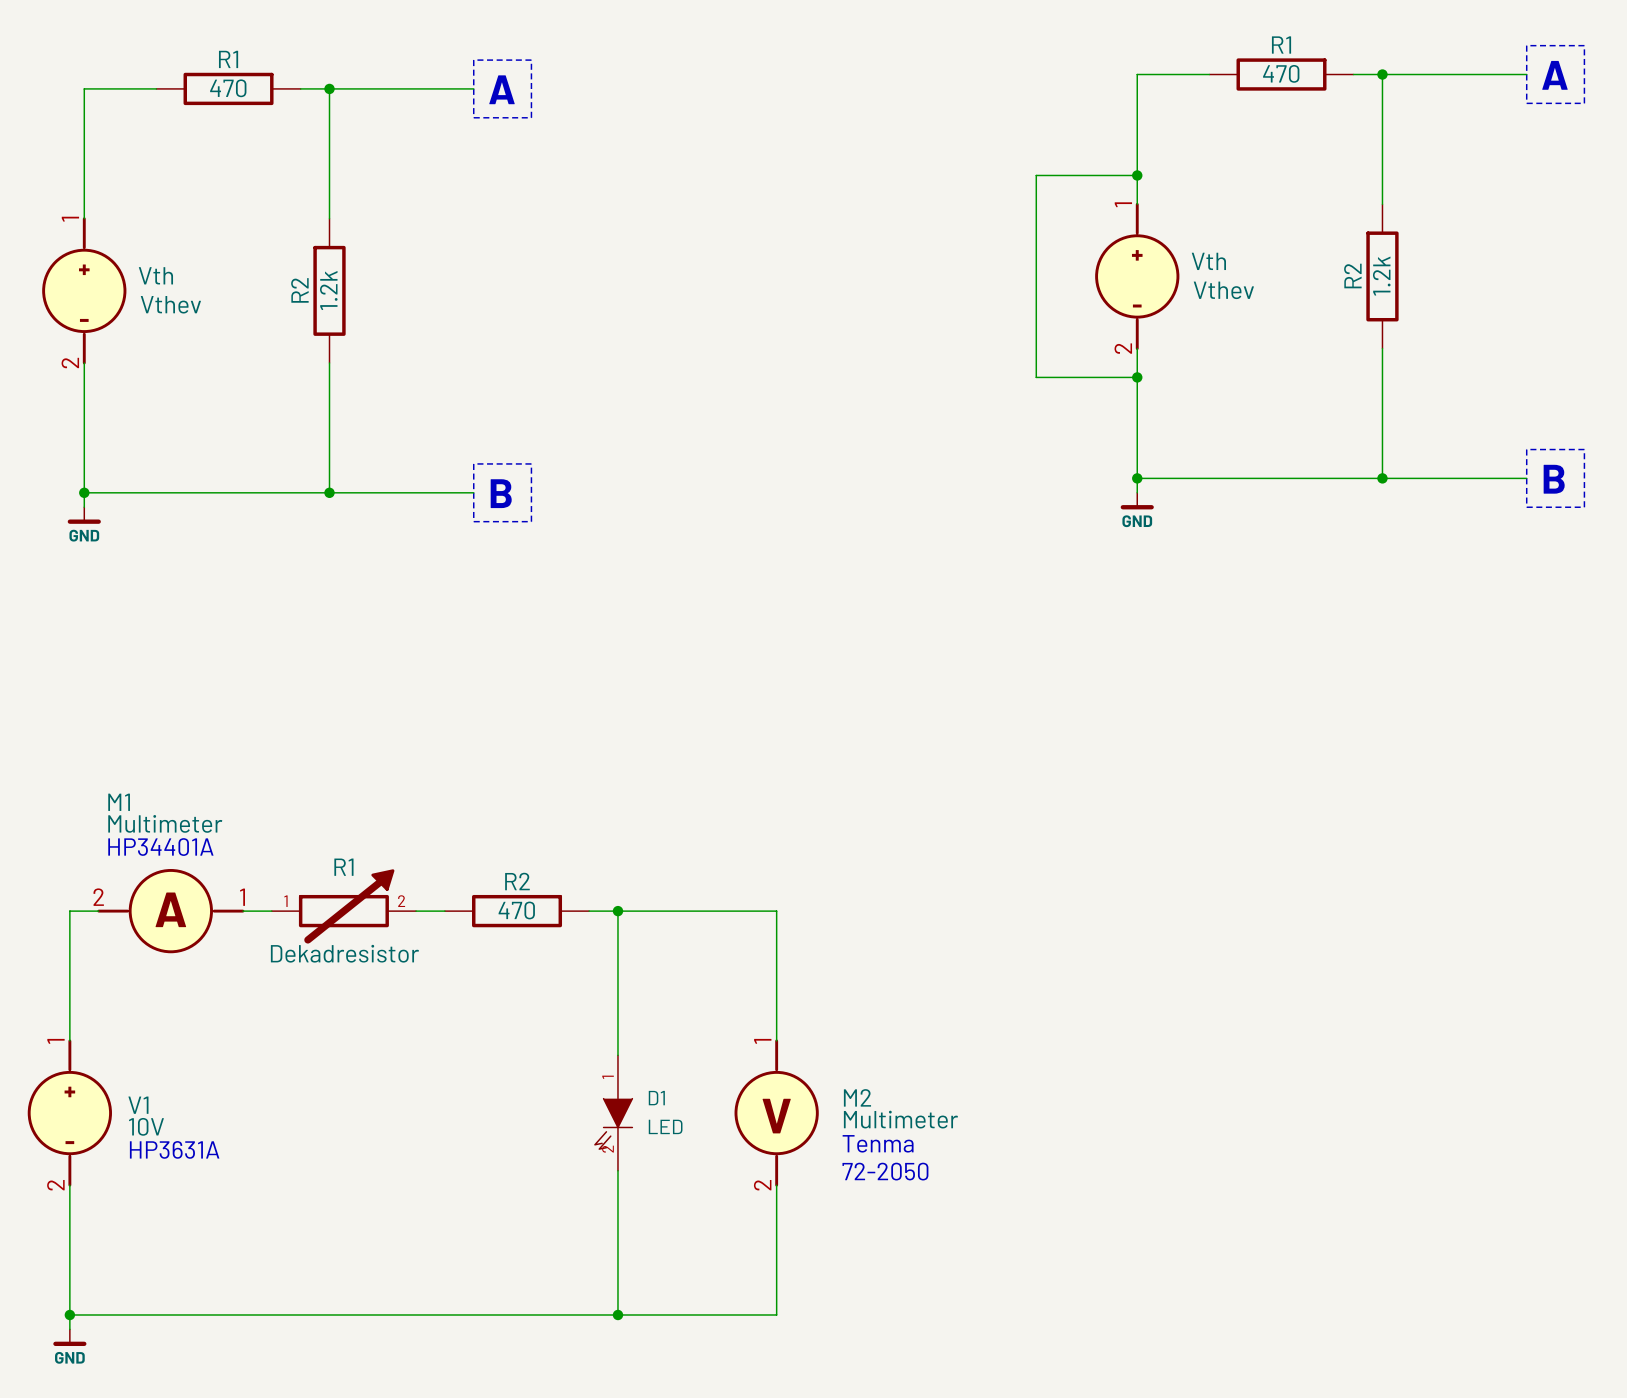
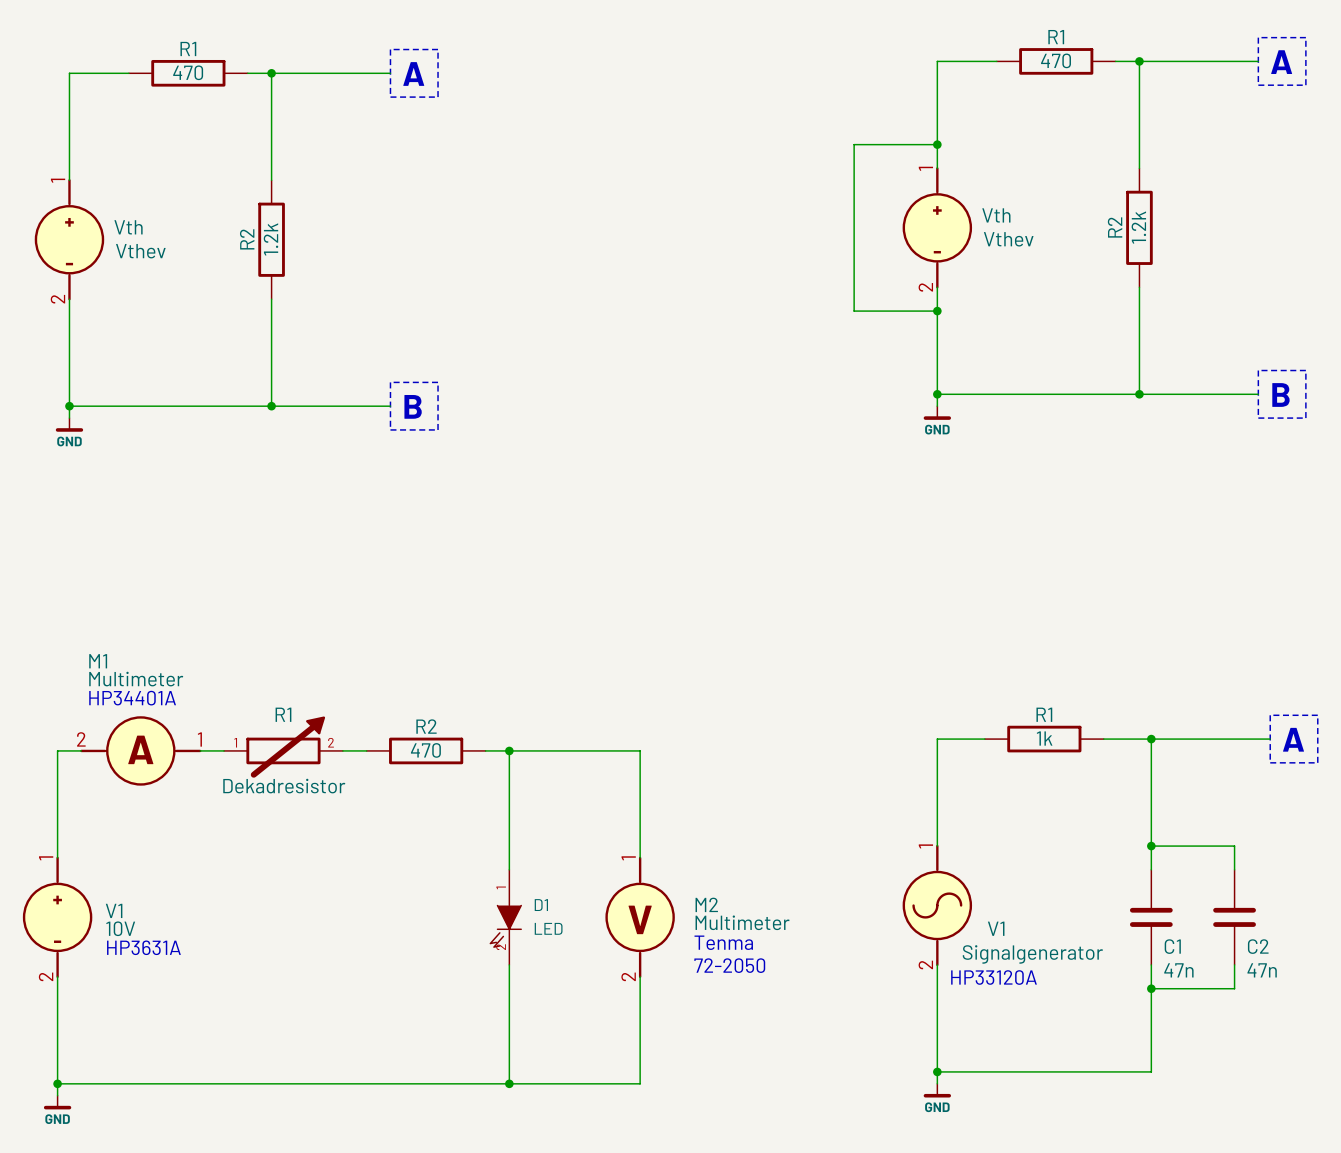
line: none -> (1270, 715) (1270, 762) (1317, 762) (1317, 715) (1270, 715)
wire: none -> (984, 739) (937, 739) (937, 846)
R1: none -> 1k (1044, 739)
wire: none -> (1103, 739) (1270, 739)
wire: none -> (1151, 739) (1151, 869)
junction: none -> (1151, 739)
text: none -> A (1293, 739)
wire: none -> (1151, 846) (1234, 846) (1234, 869)
junction: none -> (1151, 846)
V1: none -> Signalgenerator (937, 905)
C1: none -> 47n (1151, 917)
C2: none -> 47n (1234, 917)
wire: none -> (937, 964) (937, 1083)
wire: none -> (1151, 964) (1151, 1071) (937, 1071)
wire: none -> (1234, 964) (1234, 988) (1151, 988)
text: none -> HP33120A (994, 977)
junction: none -> (1151, 988)
junction: none -> (937, 1071)
power symbol: none -> GND (937, 1090)

